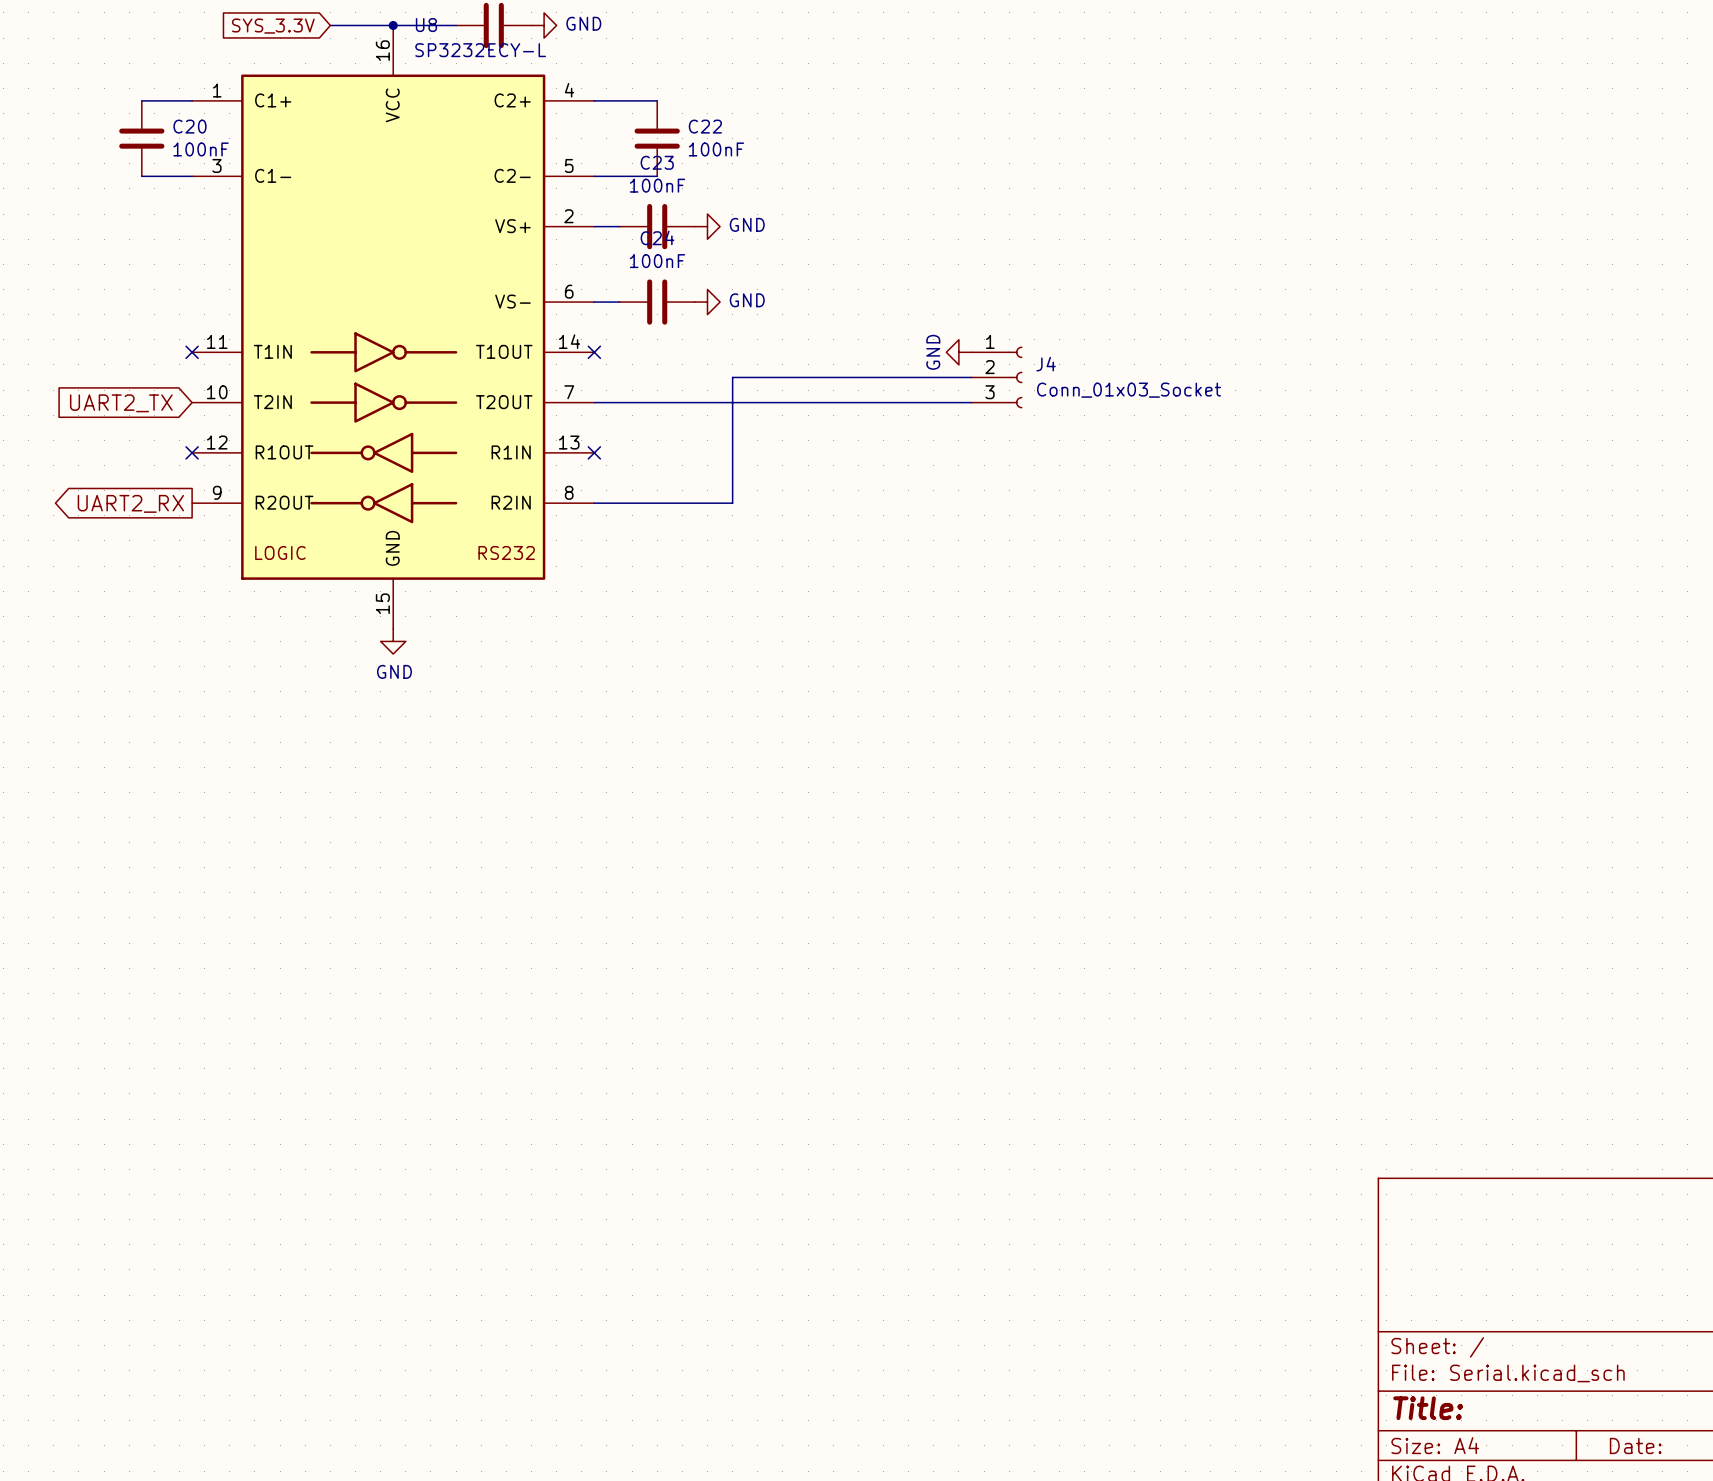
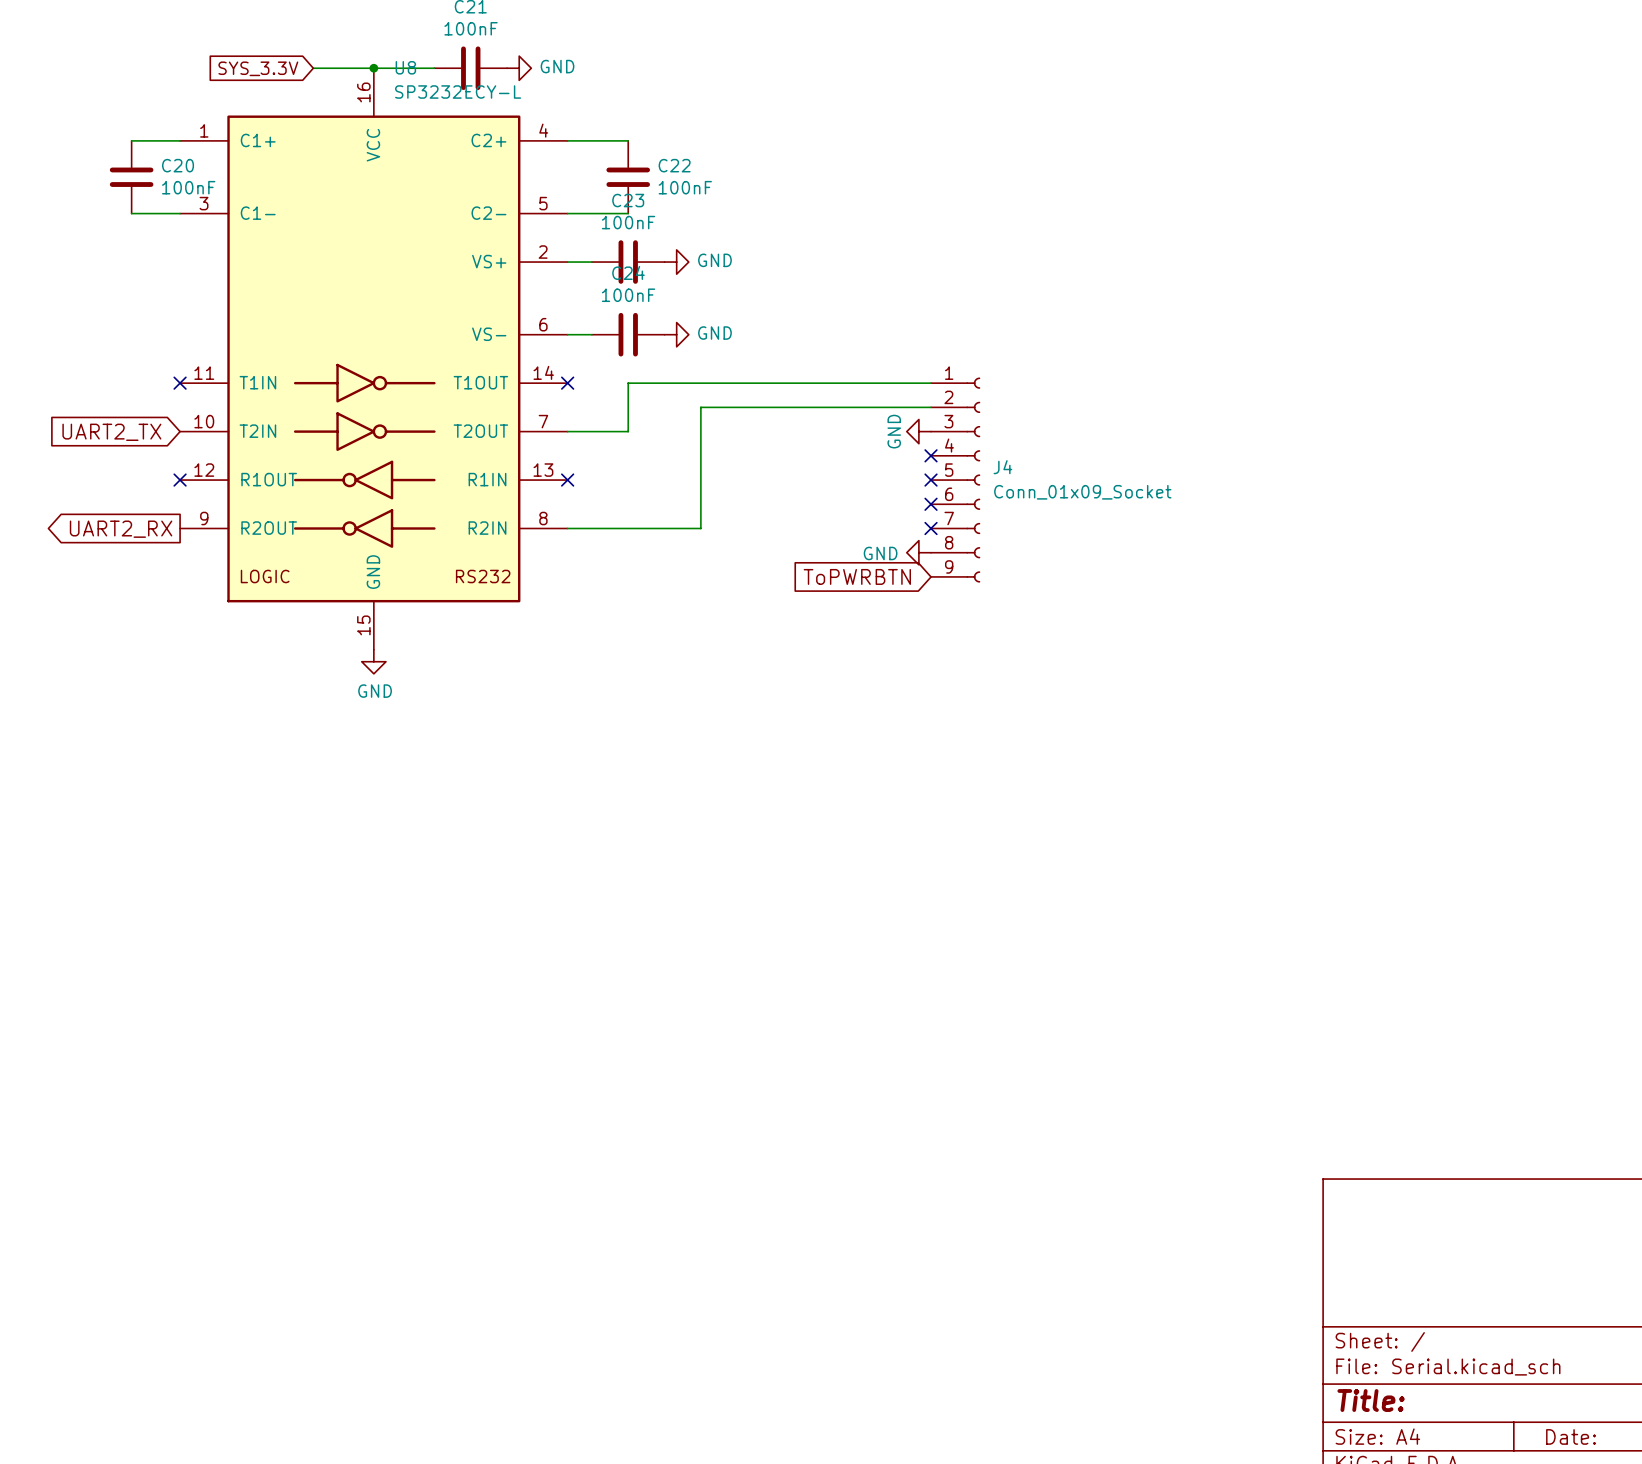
J4 symbol: [971, 346, 1023, 409] -> [931, 377, 981, 583]
power symbol position: GND (958, 352) -> GND (918, 431)
J4 value: Conn_01x03_Socket (1128, 390) -> Conn_01x09_Socket (1082, 492)
wire: (657, 402) (971, 402) -> (628, 431) (628, 383) (931, 383)
no-connect mark: none -> (931, 455)
no-connect mark: none -> (931, 480)
no-connect mark: none -> (931, 504)
no-connect mark: none -> (931, 528)
power symbol: none -> GND (918, 552)
global label: none -> ToPWRBTN (857, 576)

